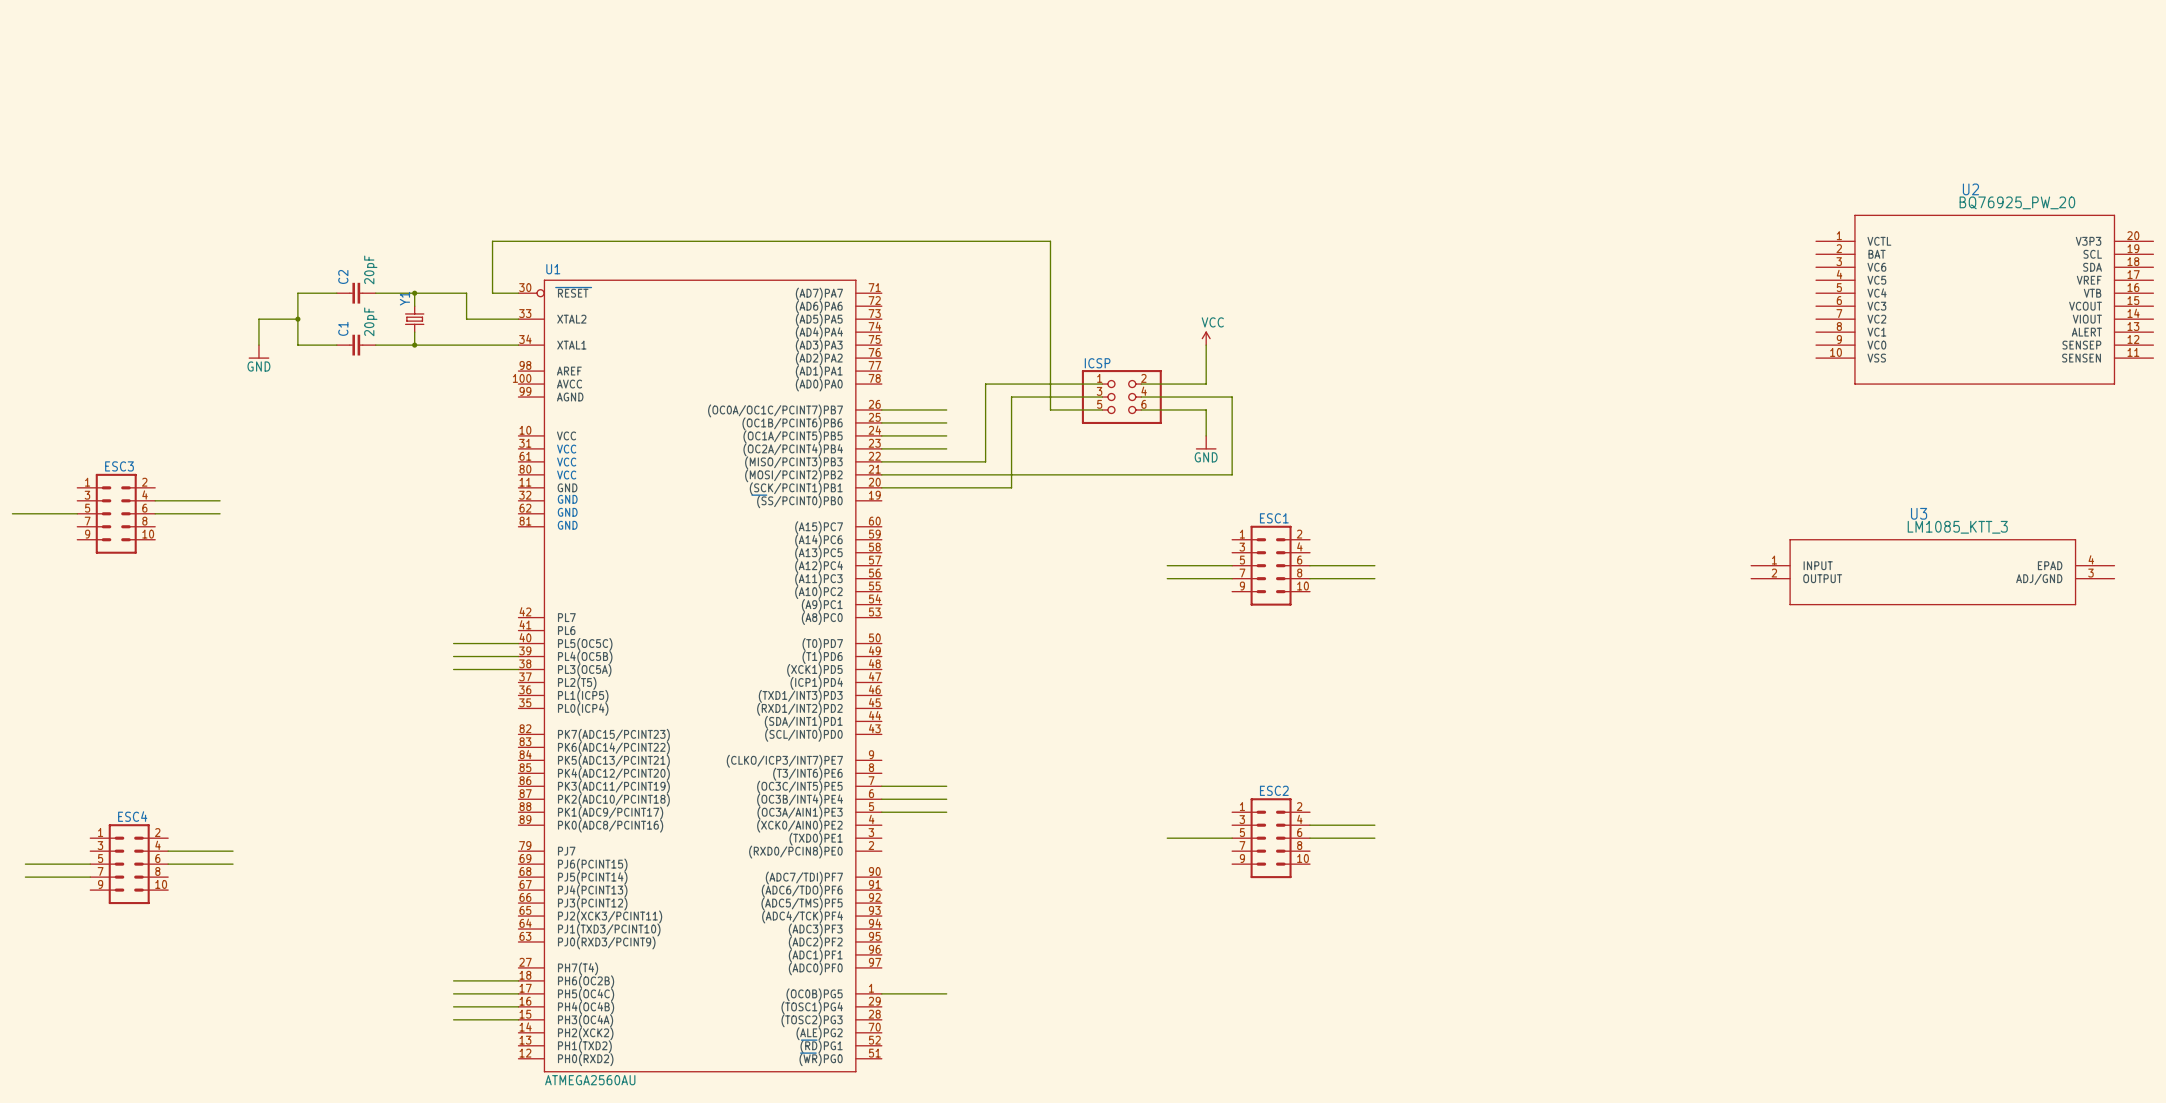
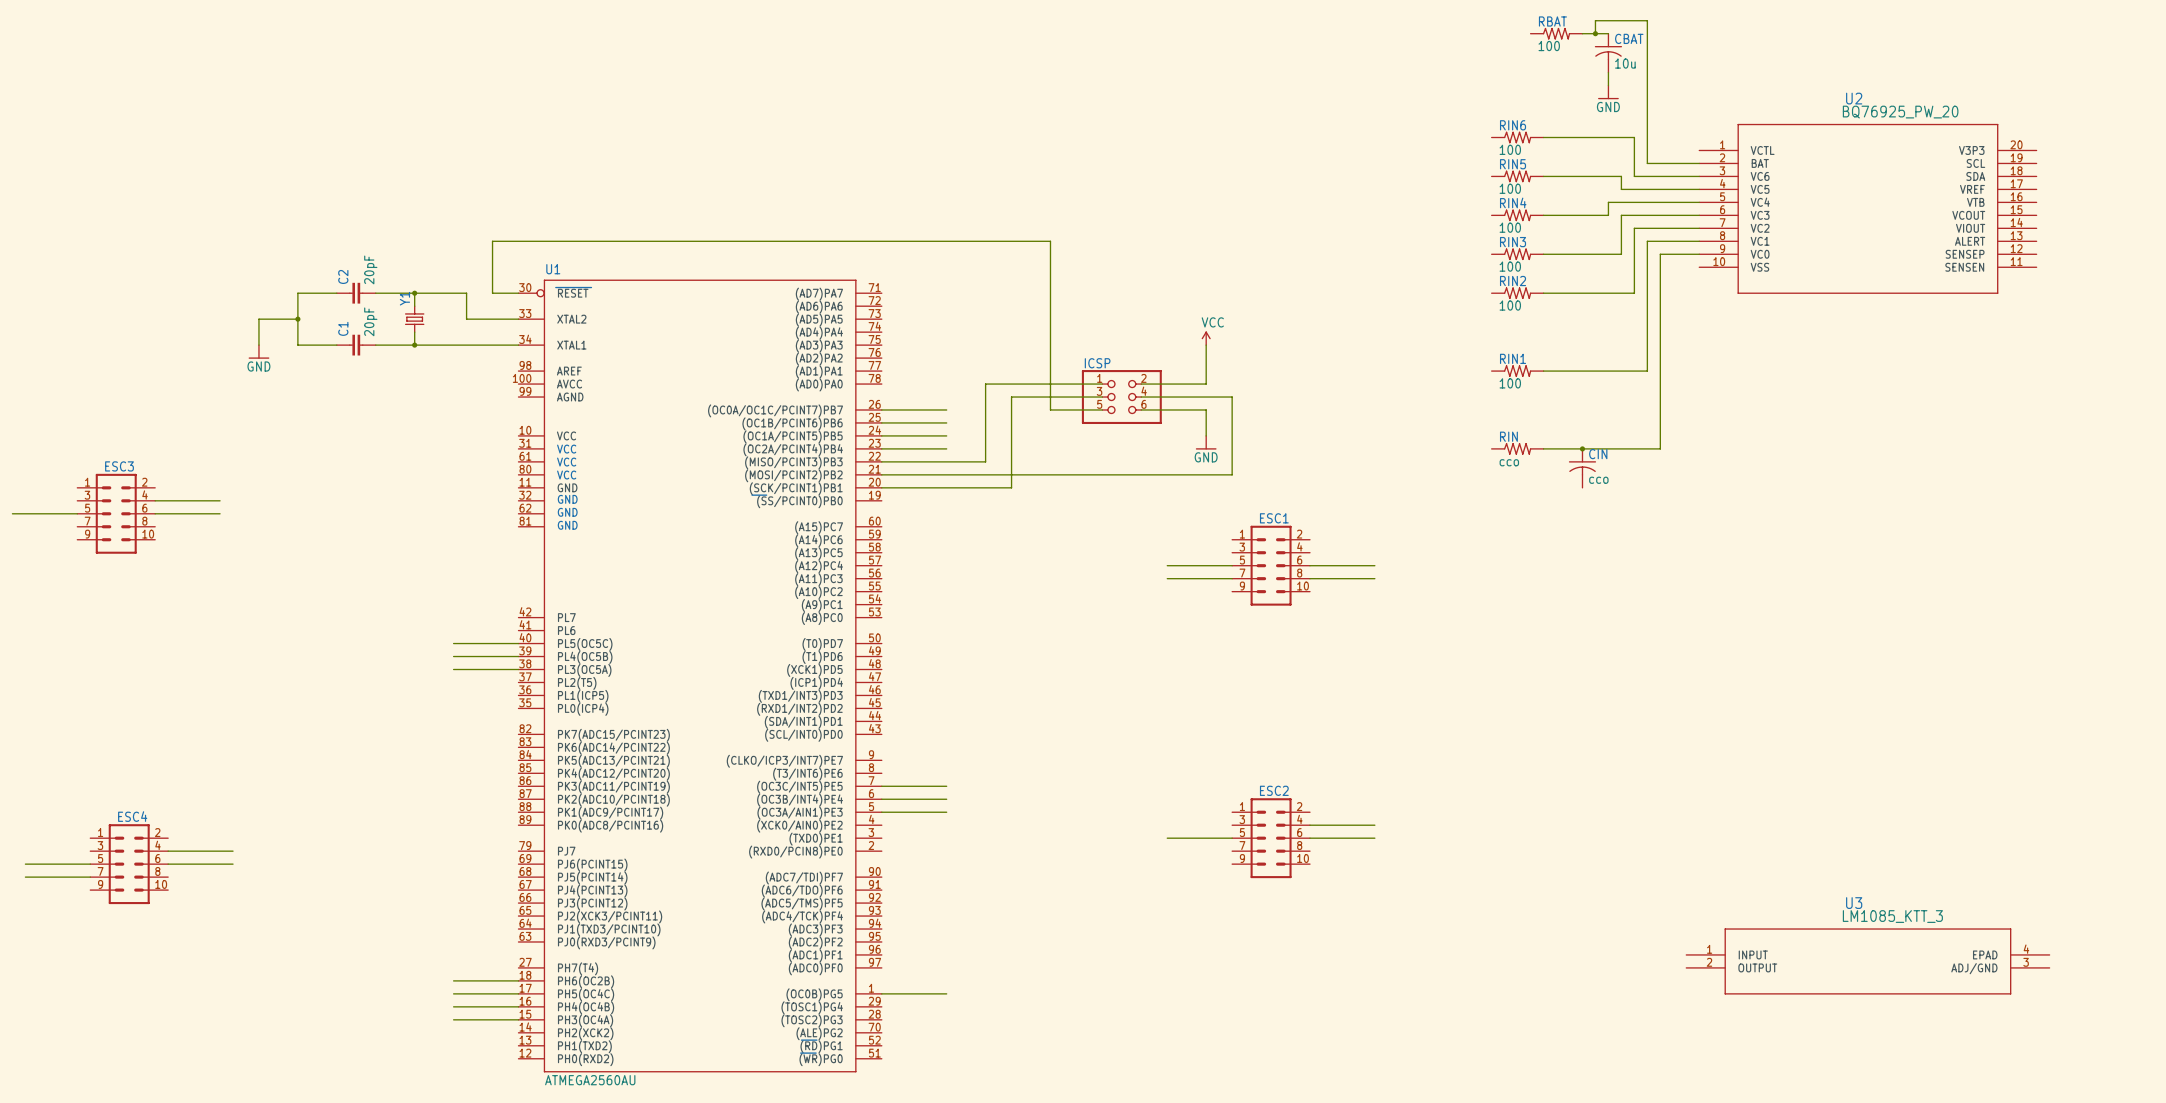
RBAT: none -> 100 (1556, 33)
wire: none -> (1582, 33) (1608, 33)
wire: none -> (1595, 33) (1595, 20) (1647, 20) (1647, 163) (1699, 163)
junction: none -> (1595, 33)
CBAT: none -> 10u (1608, 53)
wire: none -> (1608, 72) (1608, 85)
power symbol: none -> GND (1608, 92)
RIN6: none -> 100 (1517, 137)
wire: none -> (1543, 137) (1634, 137) (1634, 176) (1699, 176)
RIN5: none -> 100 (1517, 176)
wire: none -> (1543, 176) (1621, 176) (1621, 189) (1699, 189)
wire: none -> (1699, 202) (1608, 202) (1608, 215) (1543, 215)
RIN4: none -> 100 (1517, 215)
wire: none -> (1699, 215) (1621, 215) (1621, 254) (1543, 254)
wire: none -> (1699, 228) (1634, 228) (1634, 293) (1543, 293)
wire: none -> (1699, 241) (1647, 241) (1647, 371) (1543, 371)
RIN3: none -> 100 (1517, 254)
wire: none -> (1699, 254) (1660, 254) (1660, 448) (1543, 448)
RIN2: none -> 100 (1517, 293)
U2 position: (1984, 299) -> (1867, 208)
RIN1: none -> 100 (1517, 371)
RIN: none -> cco (1517, 448)
junction: none -> (1582, 448)
CIN: none -> cco (1582, 468)
U3 position: (1932, 572) -> (1867, 961)

